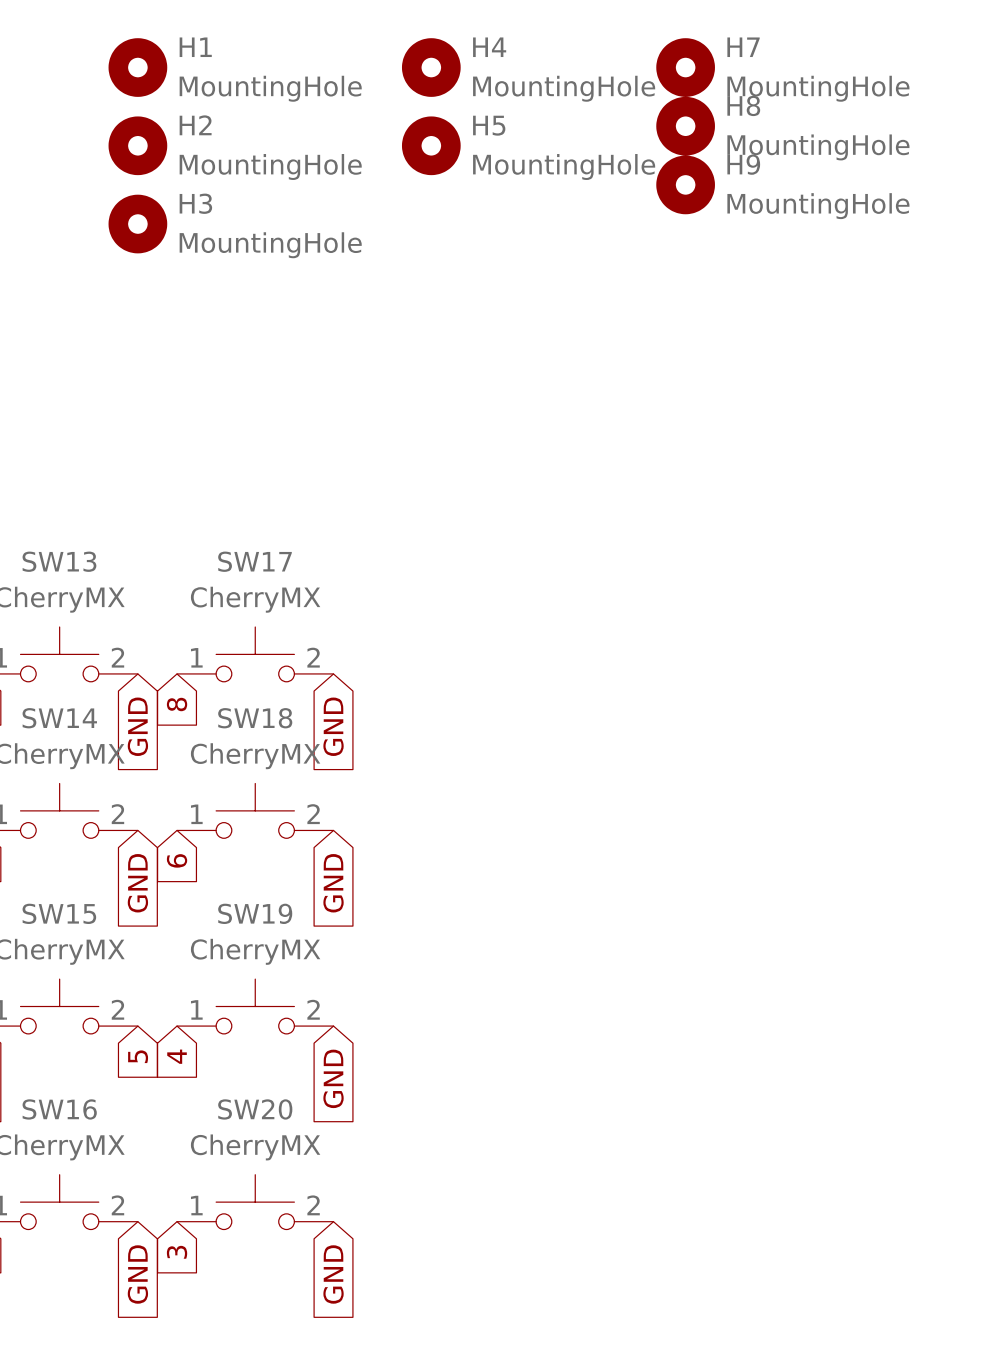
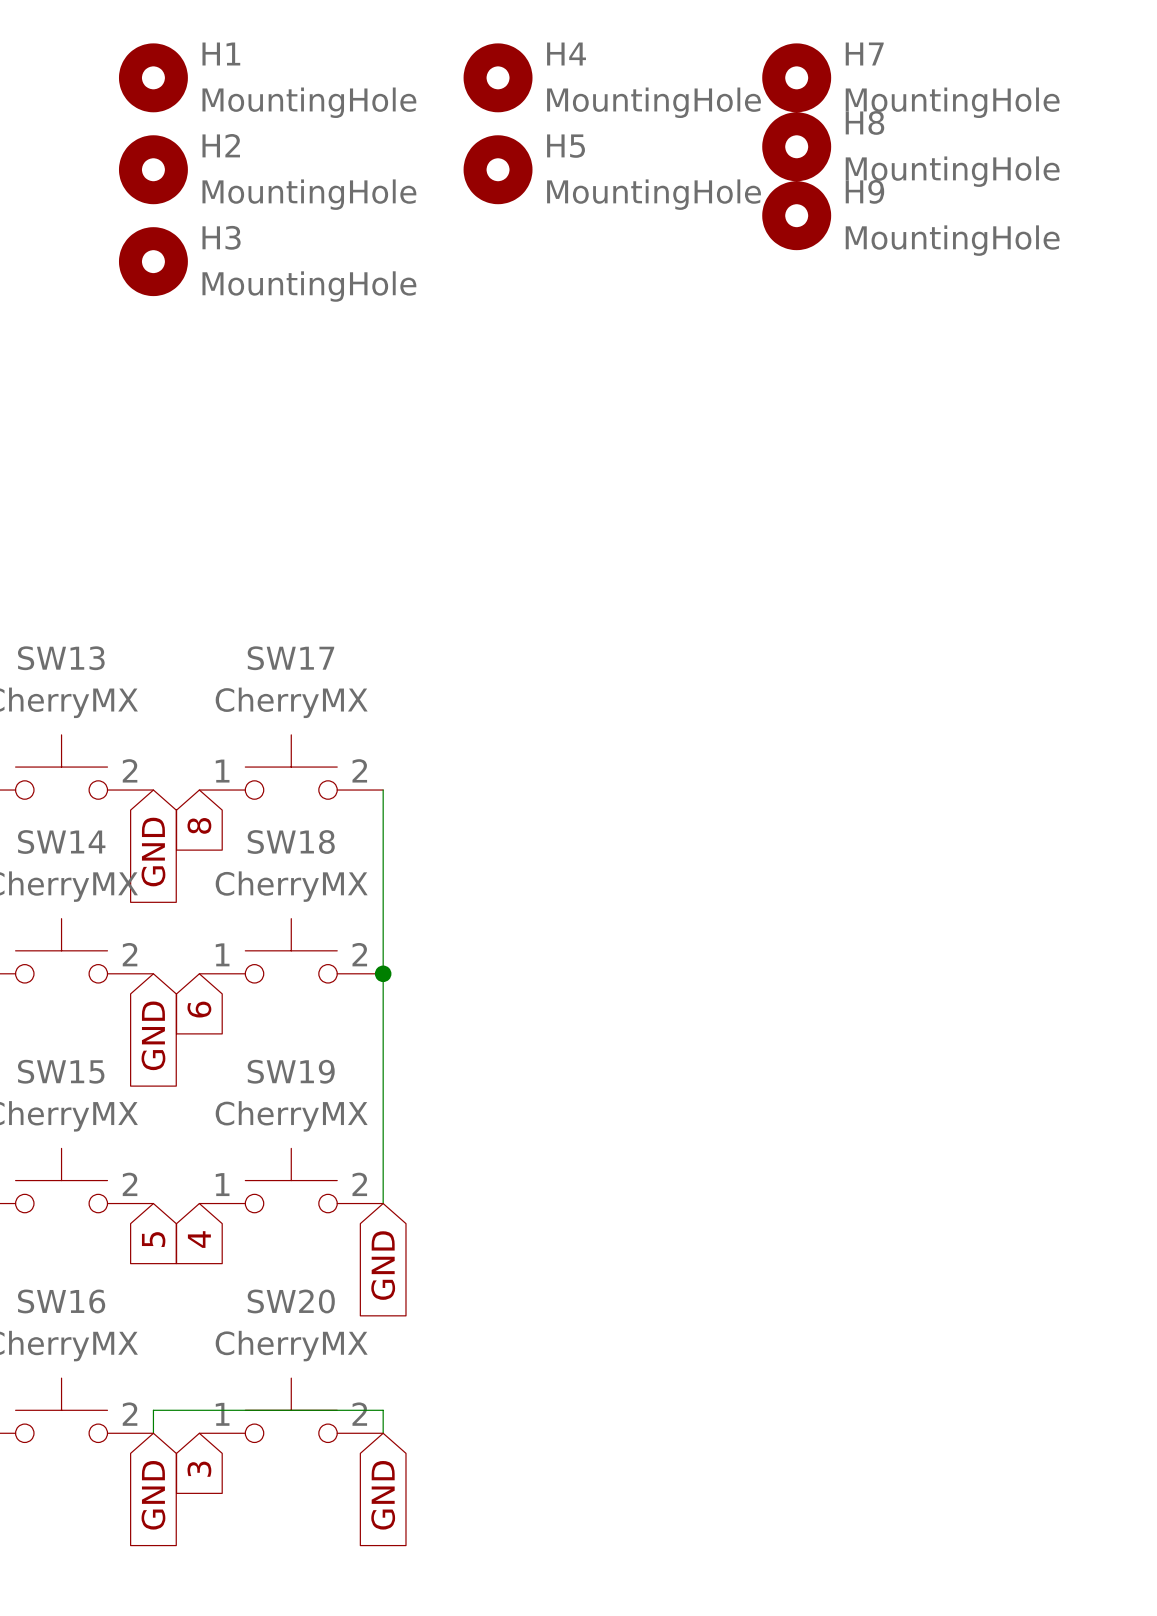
wire: none -> (383, 790) (383, 1203)
global label: GND (333, 726) -> none
junction: none -> (383, 973)
global label: GND (333, 883) -> none
wire: none -> (153, 1433) (153, 1410) (383, 1410) (383, 1433)

